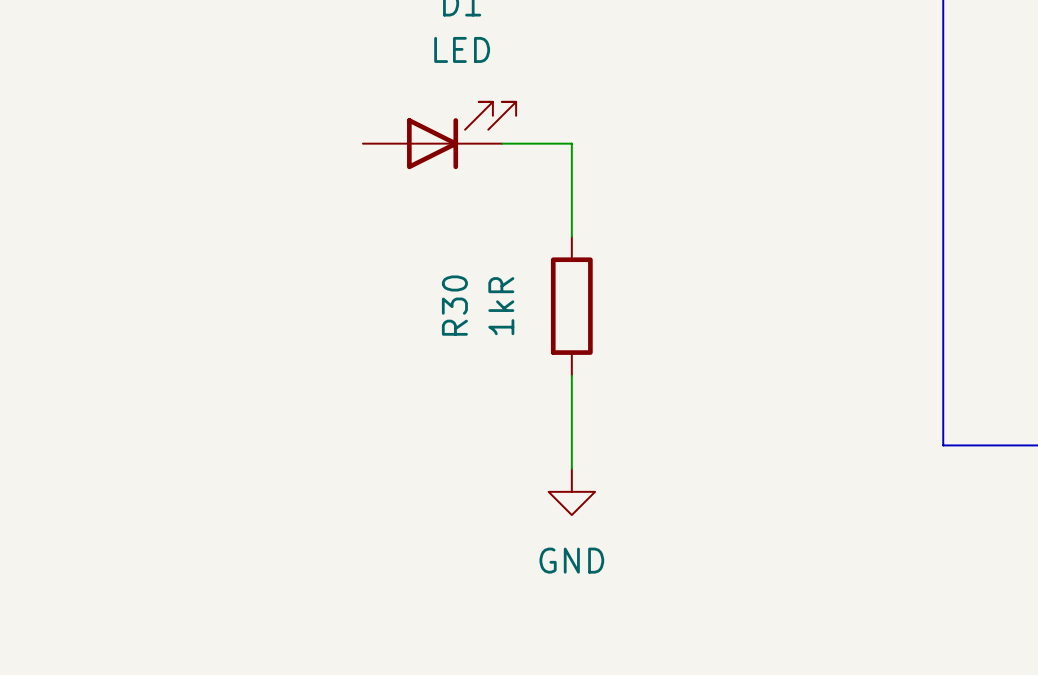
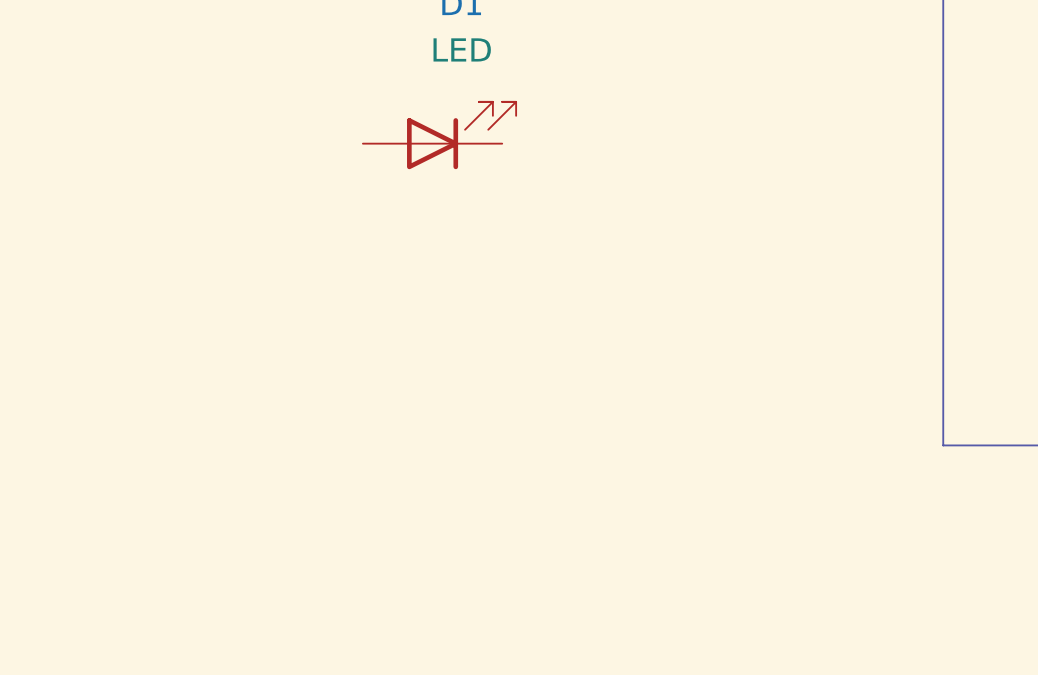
wire: (502, 143) (571, 143) (571, 236) -> none
R30: 1kR (571, 306) -> none
wire: (571, 375) (571, 468) -> none
power symbol: GND (571, 491) -> none

